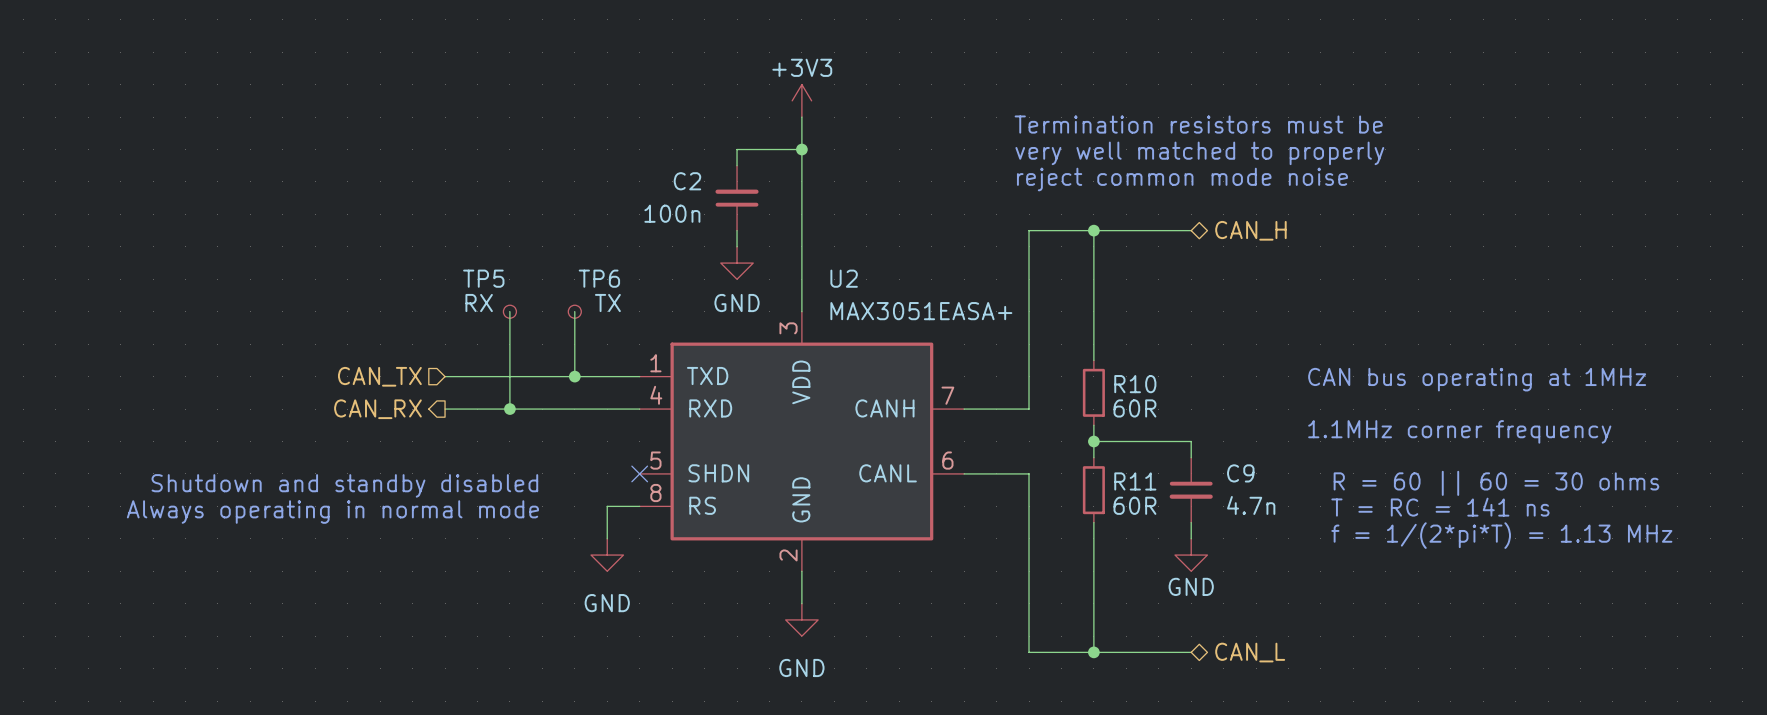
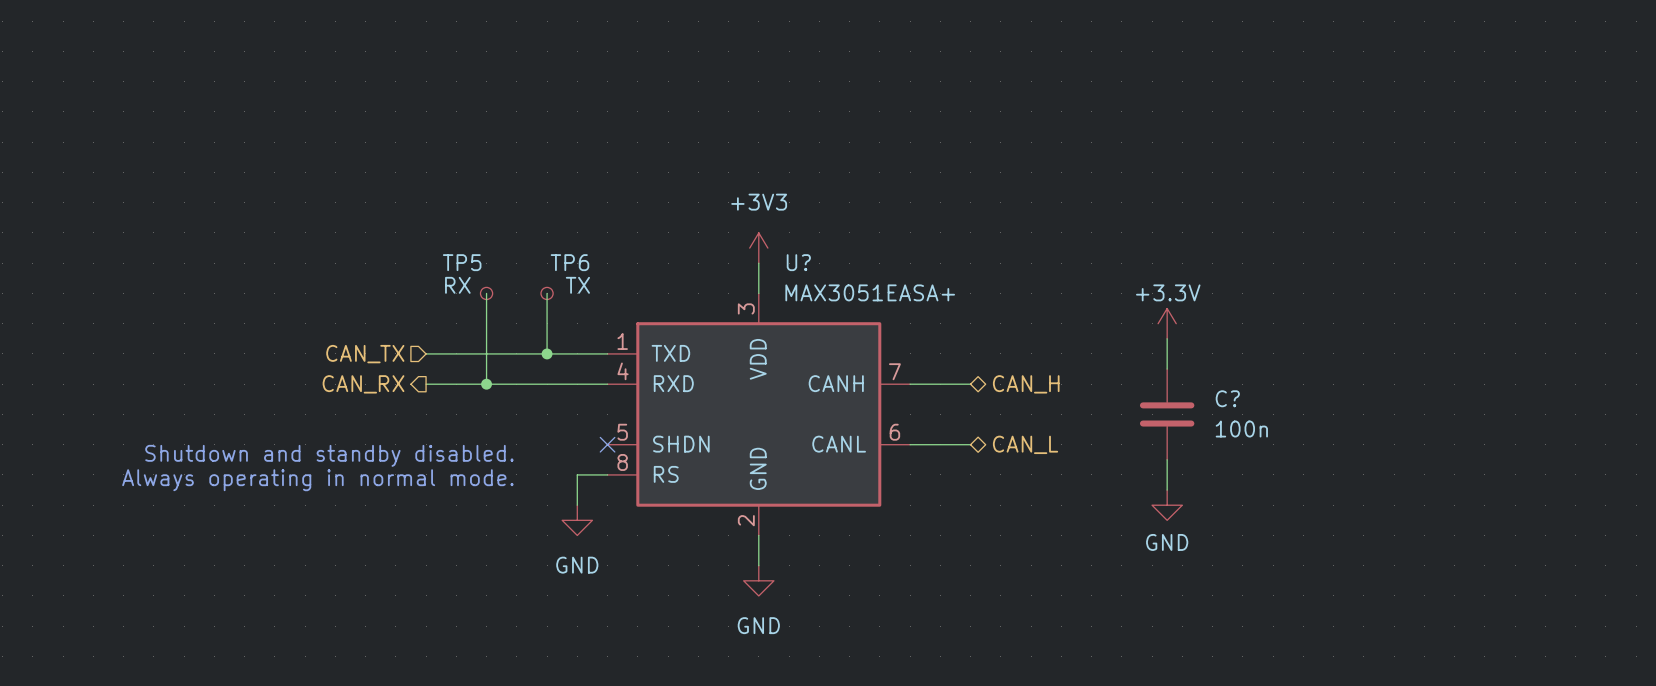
power symbol text position: +3V3 (802, 67) -> +3V3 (759, 202)
power symbol position: +3V3 (801, 100) -> +3V3 (758, 248)
wire: (801, 117) (801, 279) -> none
text: Termination resistors must be (1198, 124) -> none
wire: (801, 149) (737, 149) (737, 165) -> none
junction: (801, 149) -> none
text: very well matched to properly (1199, 153) -> none
text: reject common mode noise (1182, 179) -> none
C2: 100n (737, 198) -> none
wire: (737, 230) (737, 246) -> none
wire: (1093, 230) (1093, 360) -> none
junction: (1093, 230) -> none
wire: (1191, 230) (1029, 230) (1029, 409) -> none
hierarchical label position: CAN_H (1250, 230) -> CAN_H (1026, 384)
power symbol: GND (737, 263) -> none
U2 name: U2 (844, 278) -> U? (798, 262)
power symbol: none -> +3.3V (1167, 323)
text: CAN bus operating at 1MHz (1477, 379) -> none
R10: 60R (1093, 392) -> none
wire: (1093, 425) (1093, 457) -> (1167, 338) (1167, 369)
text: 1.1MHz corner frequency (1459, 431) -> none
wire: (1093, 441) (1191, 441) (1191, 457) -> none
junction: (1093, 441) -> none
C?: none -> 100n (1167, 414)
wire: (1029, 473) (1029, 652) (1191, 652) -> none
text: R = 60 || 60 = 30 ohms (1496, 483) -> none
text: Shutdown and standby disabled (344, 485) -> Shutdown and standby disabled. (329, 455)
R11: 60R (1093, 490) -> none
C9: 4.7n (1191, 490) -> none
wire: none -> (1167, 459) (1167, 490)
text: T = RC = 141 ns (1440, 507) -> none
text: Always operating in normal mode (332, 512) -> Always operating in normal mode. (317, 480)
wire: (1093, 522) (1093, 652) -> none
wire: (1191, 522) (1191, 538) -> none
text: f = 1/(2*pi*T) = 1.13 MHz (1501, 535) -> none
power symbol position: GND (1191, 555) -> GND (1167, 505)
power symbol text position: GND (1191, 586) -> GND (1167, 542)
junction: (1093, 652) -> none
hierarchical label position: CAN_L (1250, 652) -> CAN_L (1025, 444)

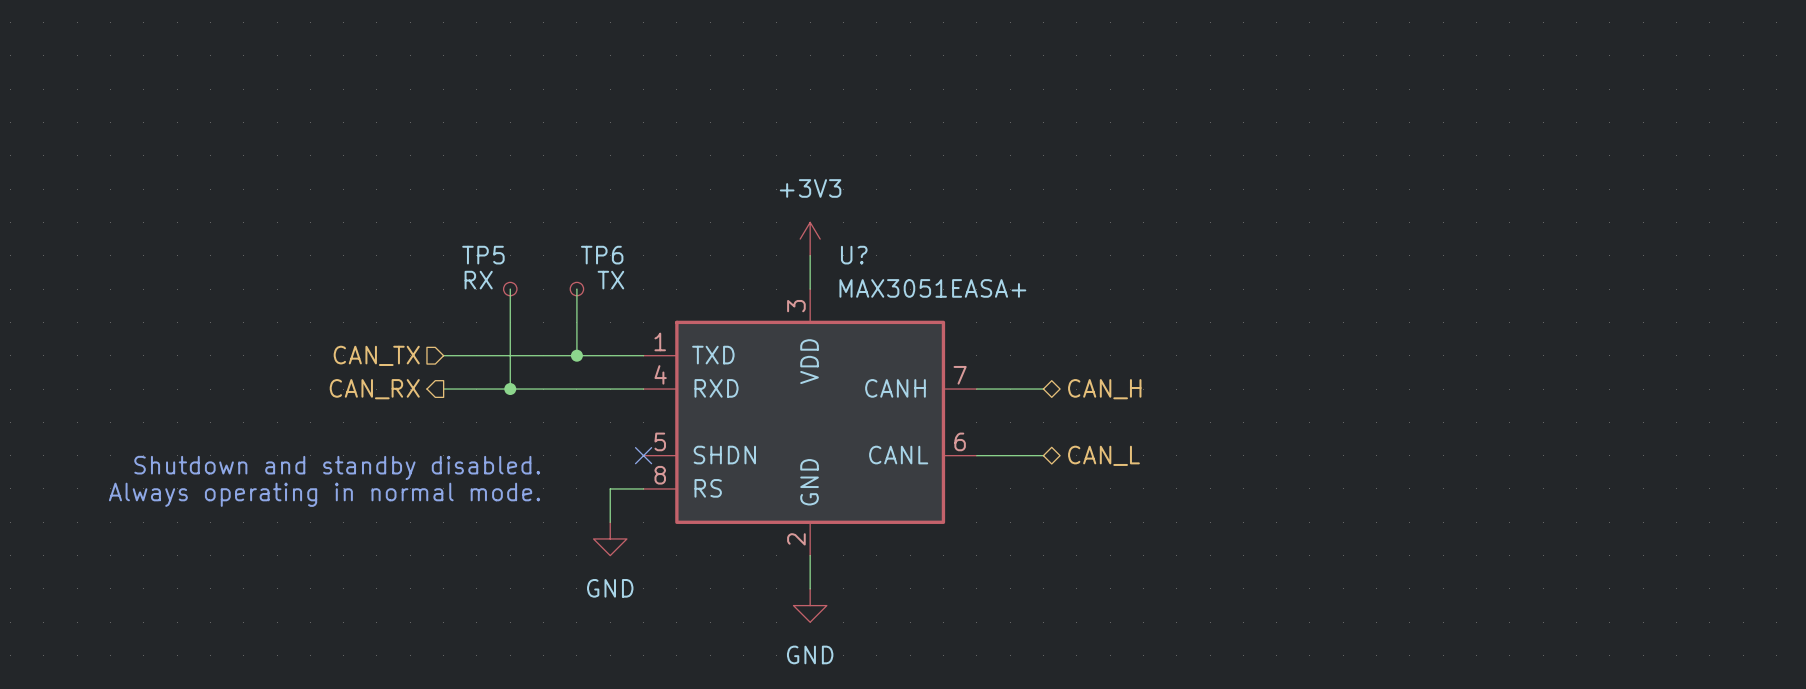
power symbol: +3.3V (1167, 323) -> none
wire: (1167, 338) (1167, 369) -> none
C?: 100n (1167, 414) -> none
wire: (1167, 459) (1167, 490) -> none
power symbol: GND (1167, 505) -> none

